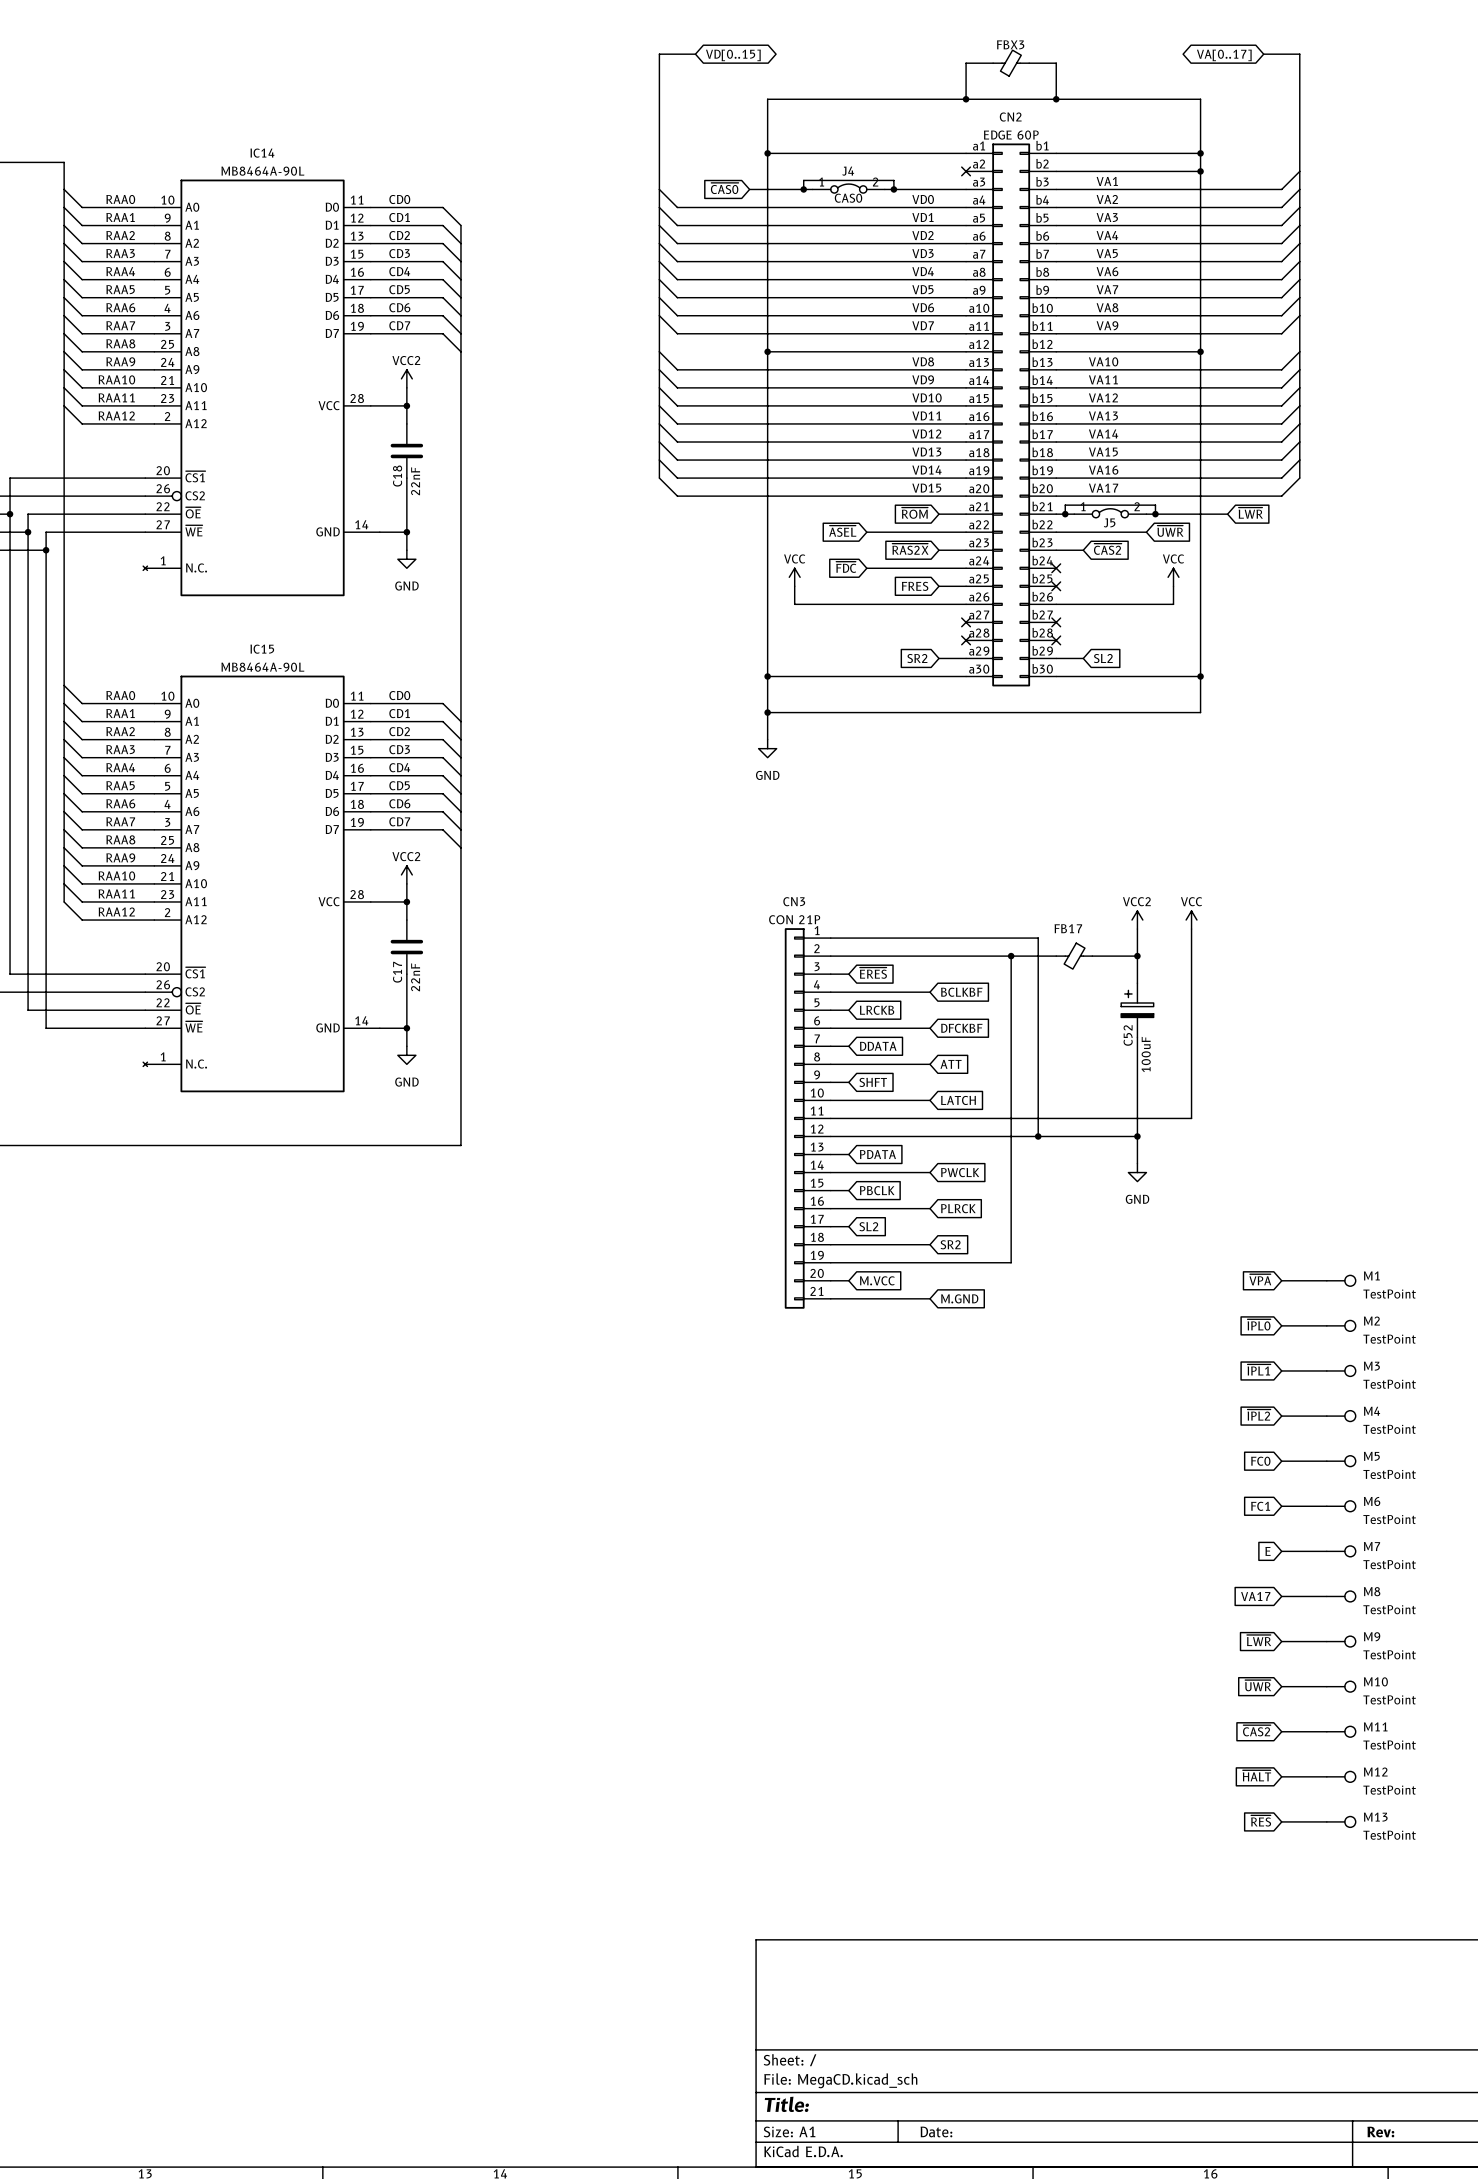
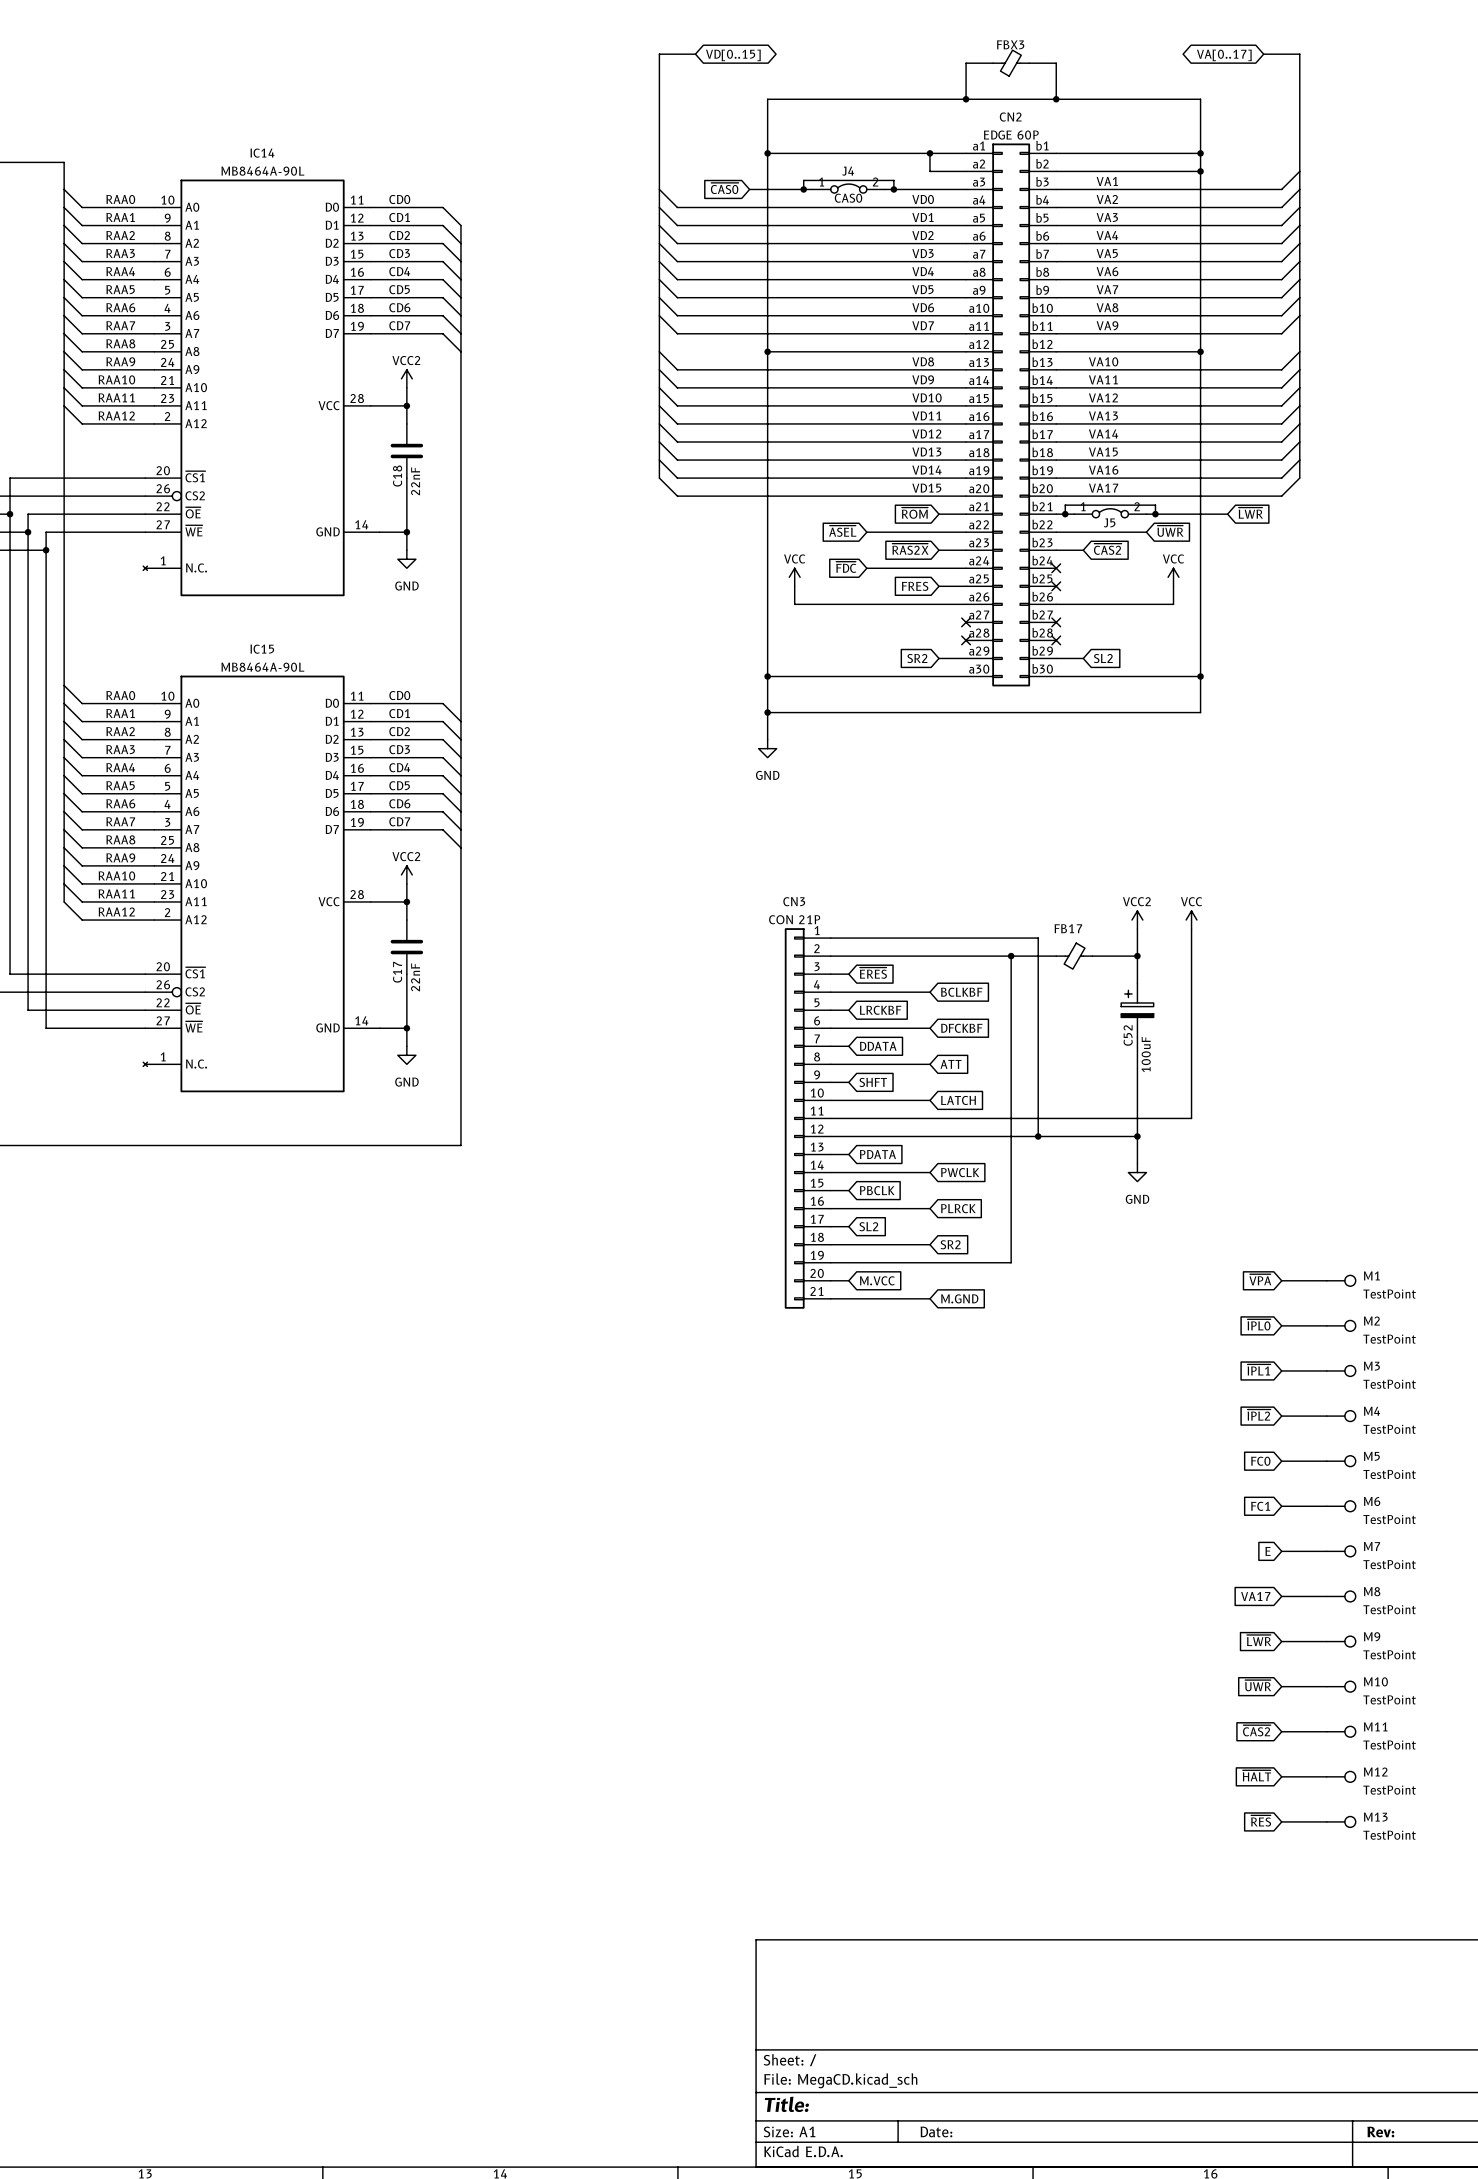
wire: none -> (929, 153) (929, 171) (966, 171)
junction: none -> (929, 153)
no-connect mark: (966, 171) -> none
global label: LRCKB (877, 1010) -> LRCKBF (880, 1010)

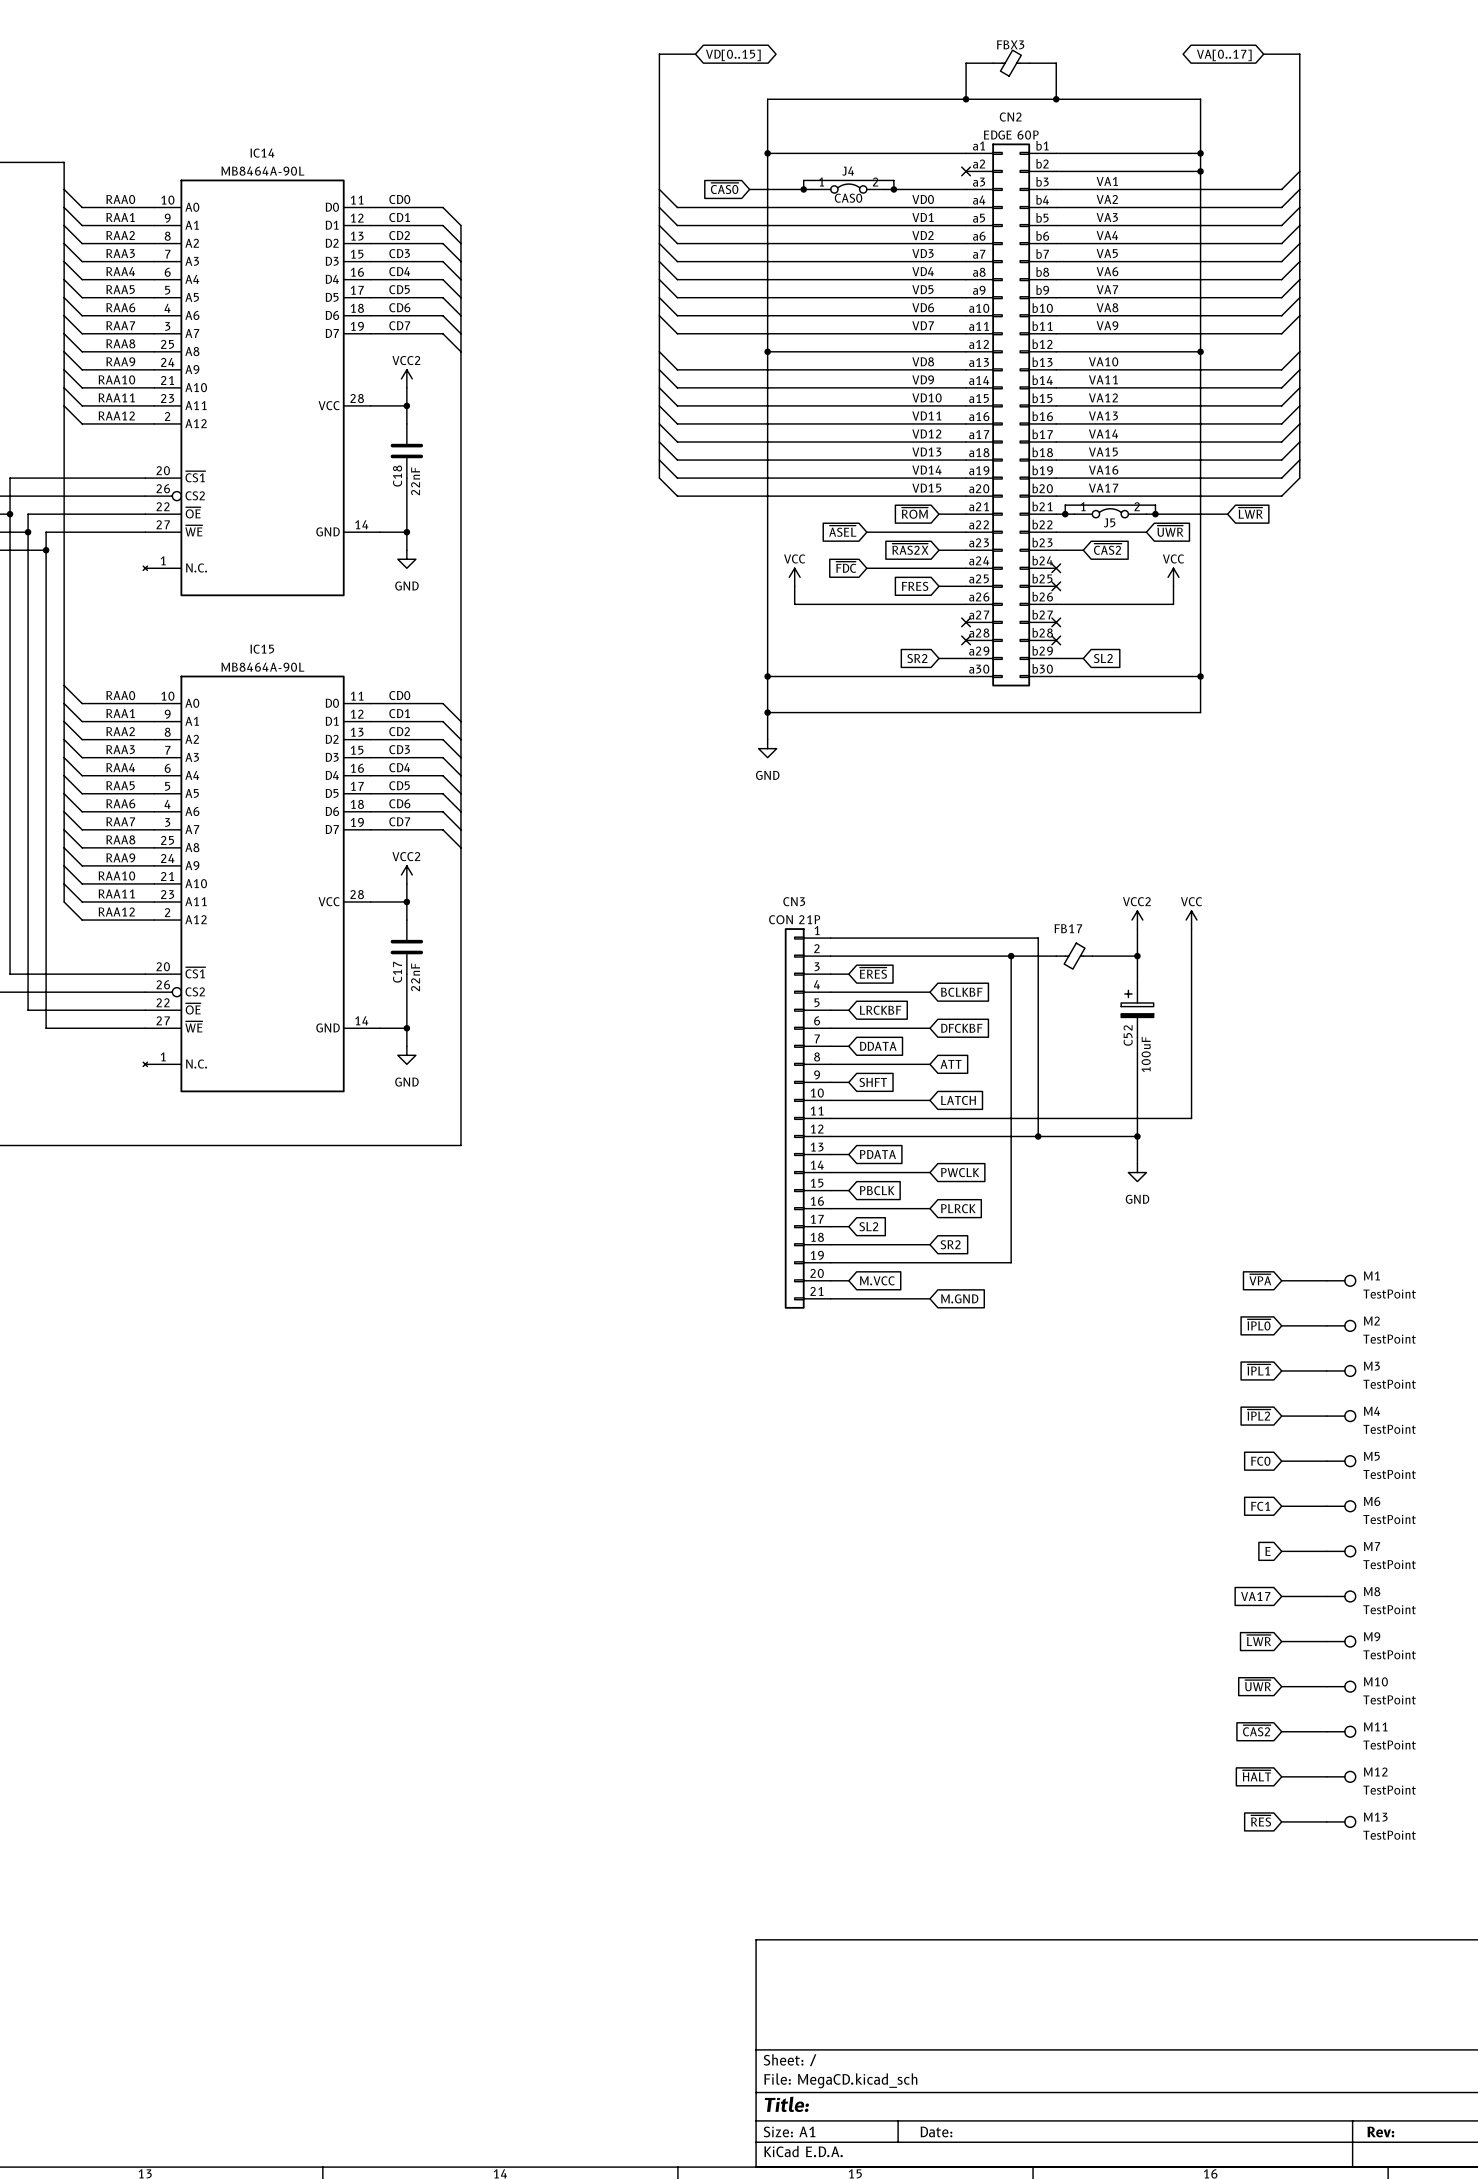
wire: (929, 153) (929, 171) (966, 171) -> none
junction: (929, 153) -> none
no-connect mark: none -> (966, 171)

